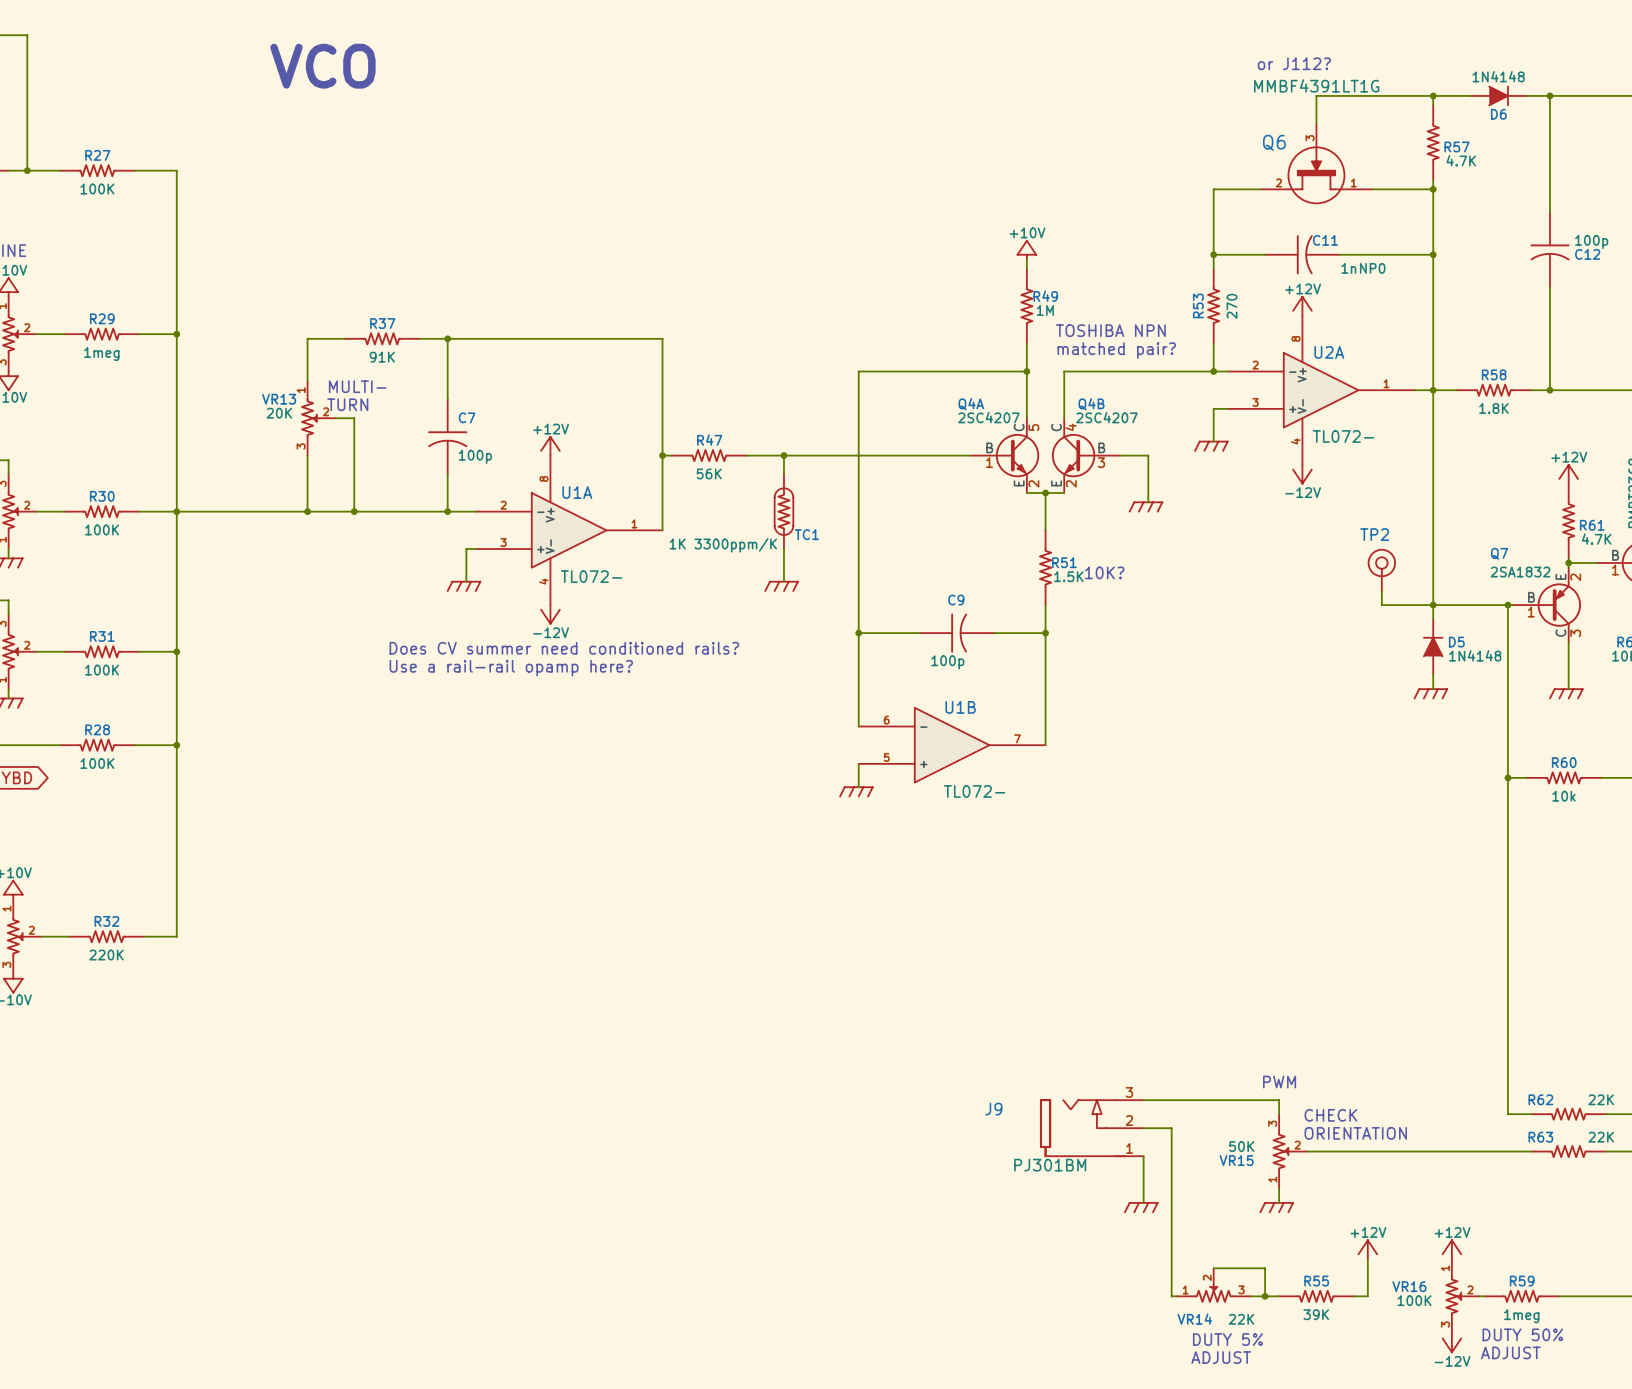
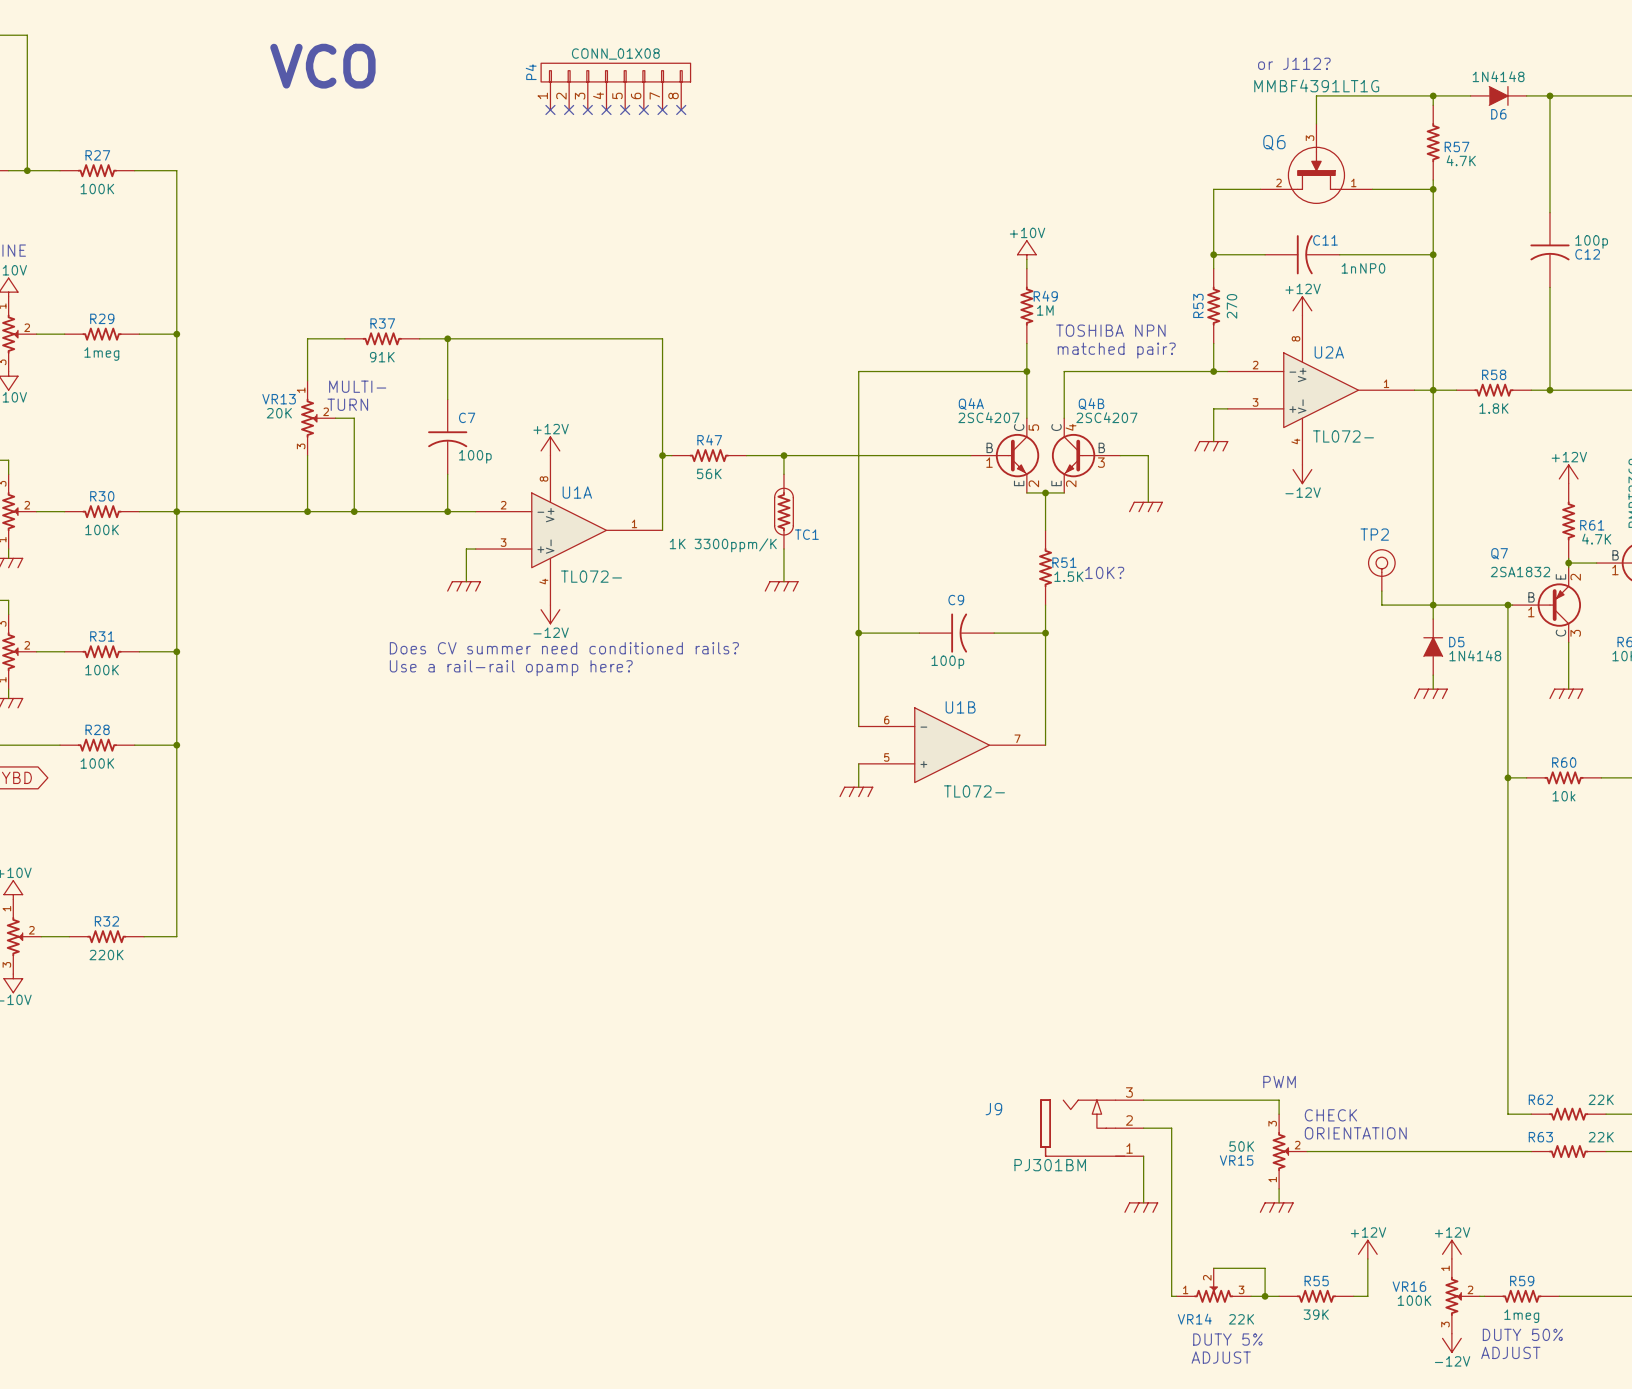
P4: none -> CONN_01X08 (615, 86)
no-connect mark: none -> (550, 109)
no-connect mark: none -> (569, 109)
no-connect mark: none -> (587, 109)
no-connect mark: none -> (606, 109)
no-connect mark: none -> (625, 109)
no-connect mark: none -> (643, 109)
no-connect mark: none -> (662, 109)
no-connect mark: none -> (681, 109)

